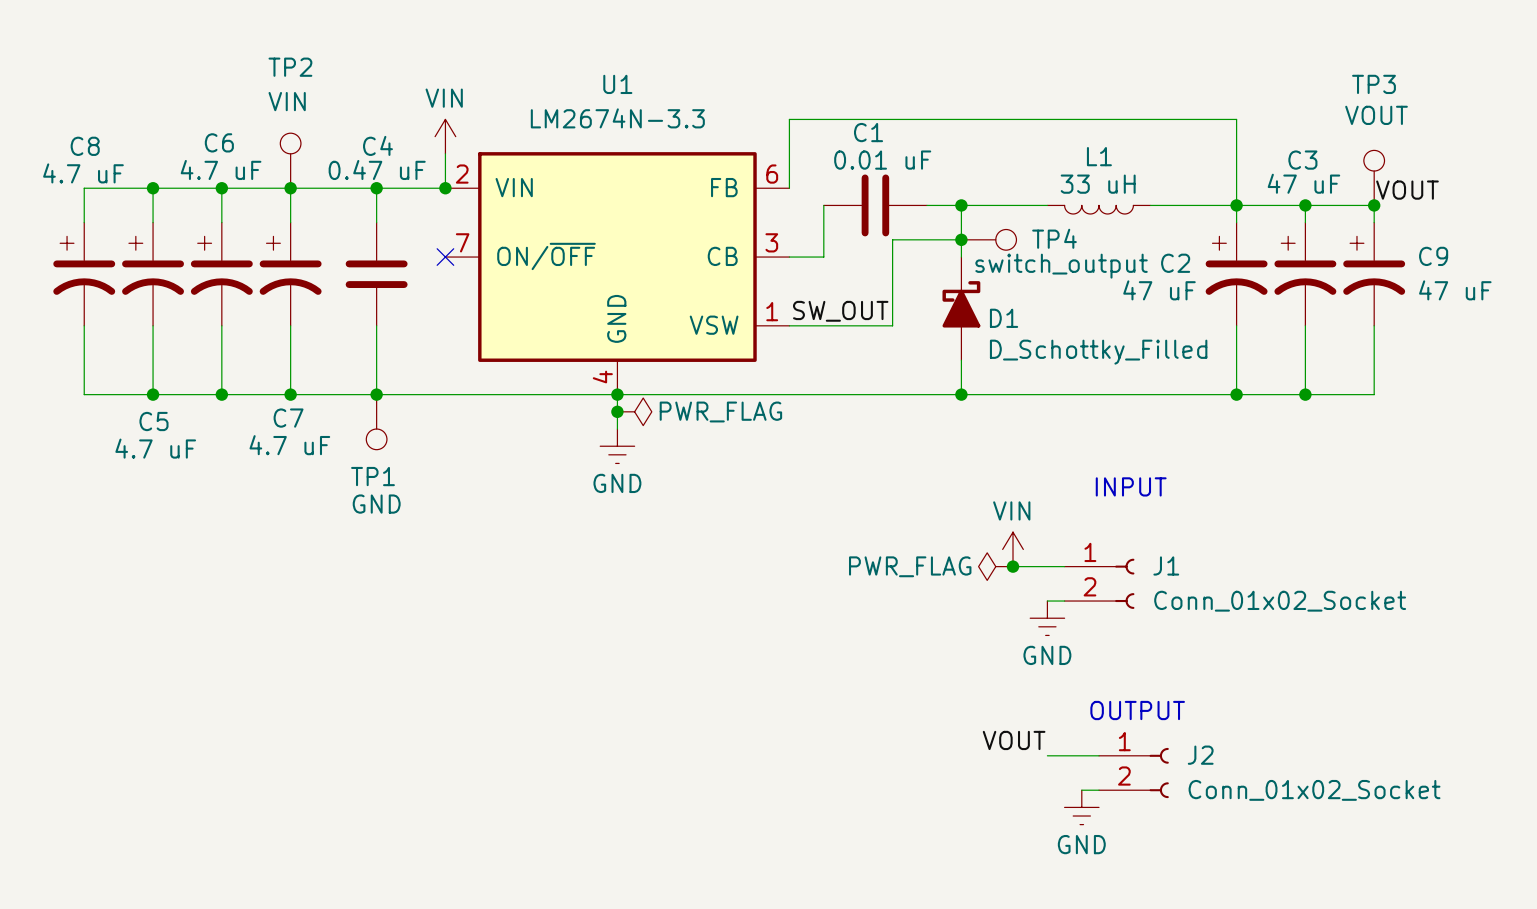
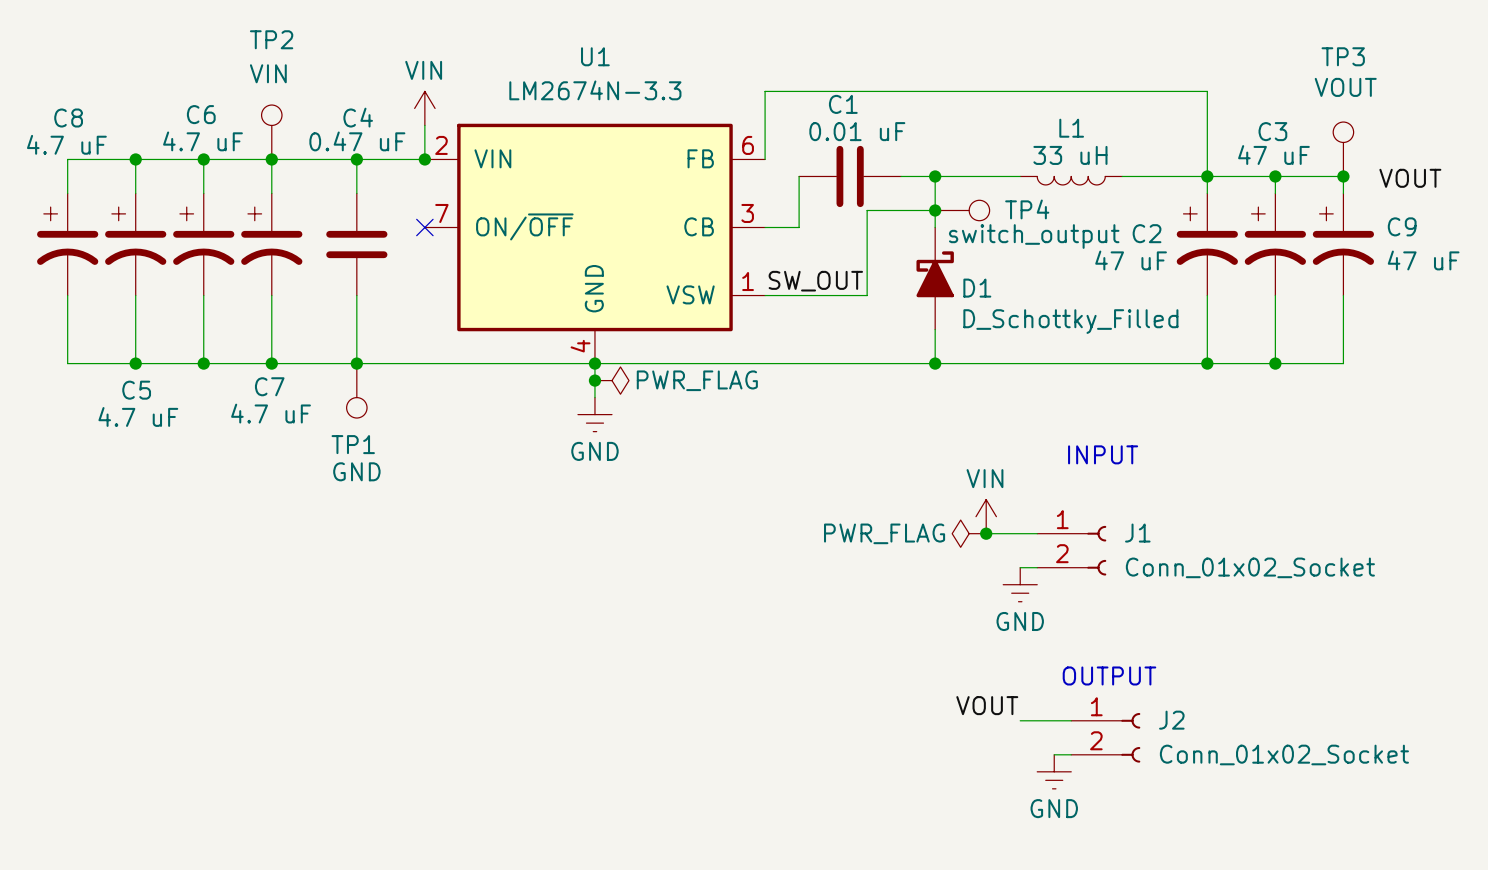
label position: VOUT (1407, 190) -> VOUT (1410, 178)

